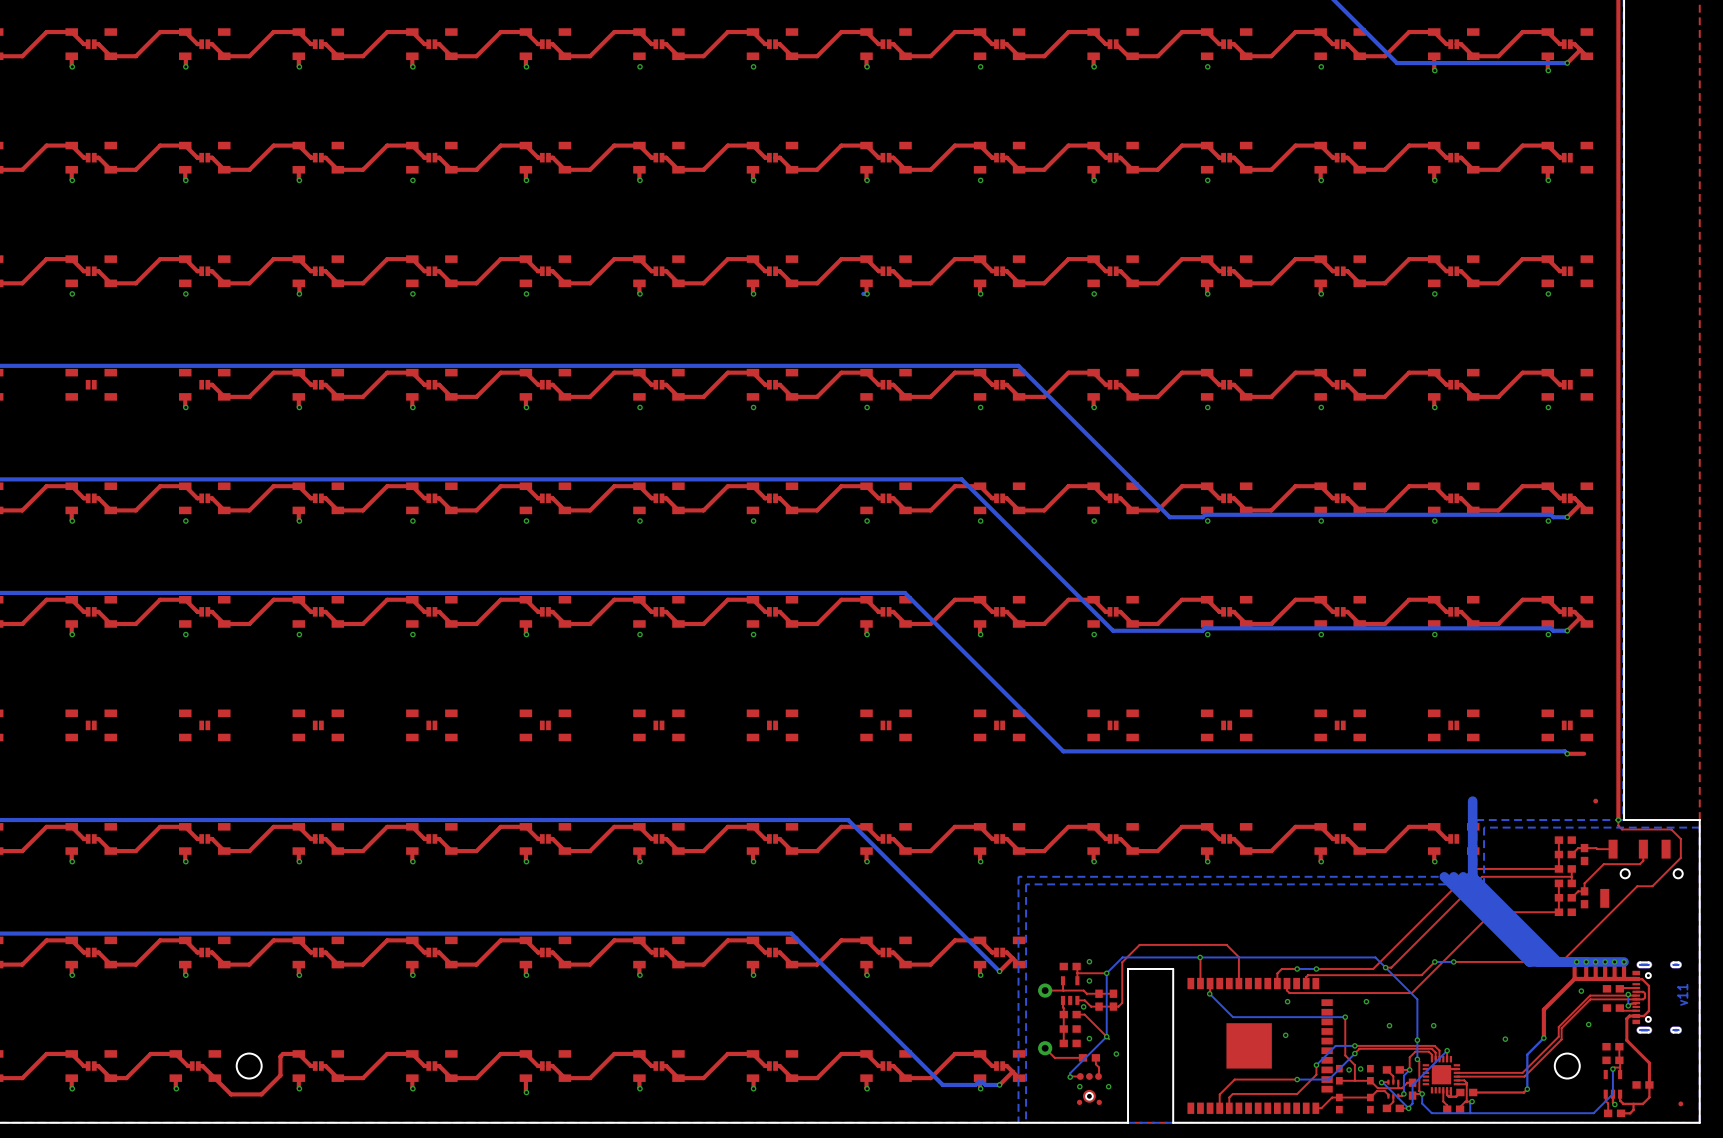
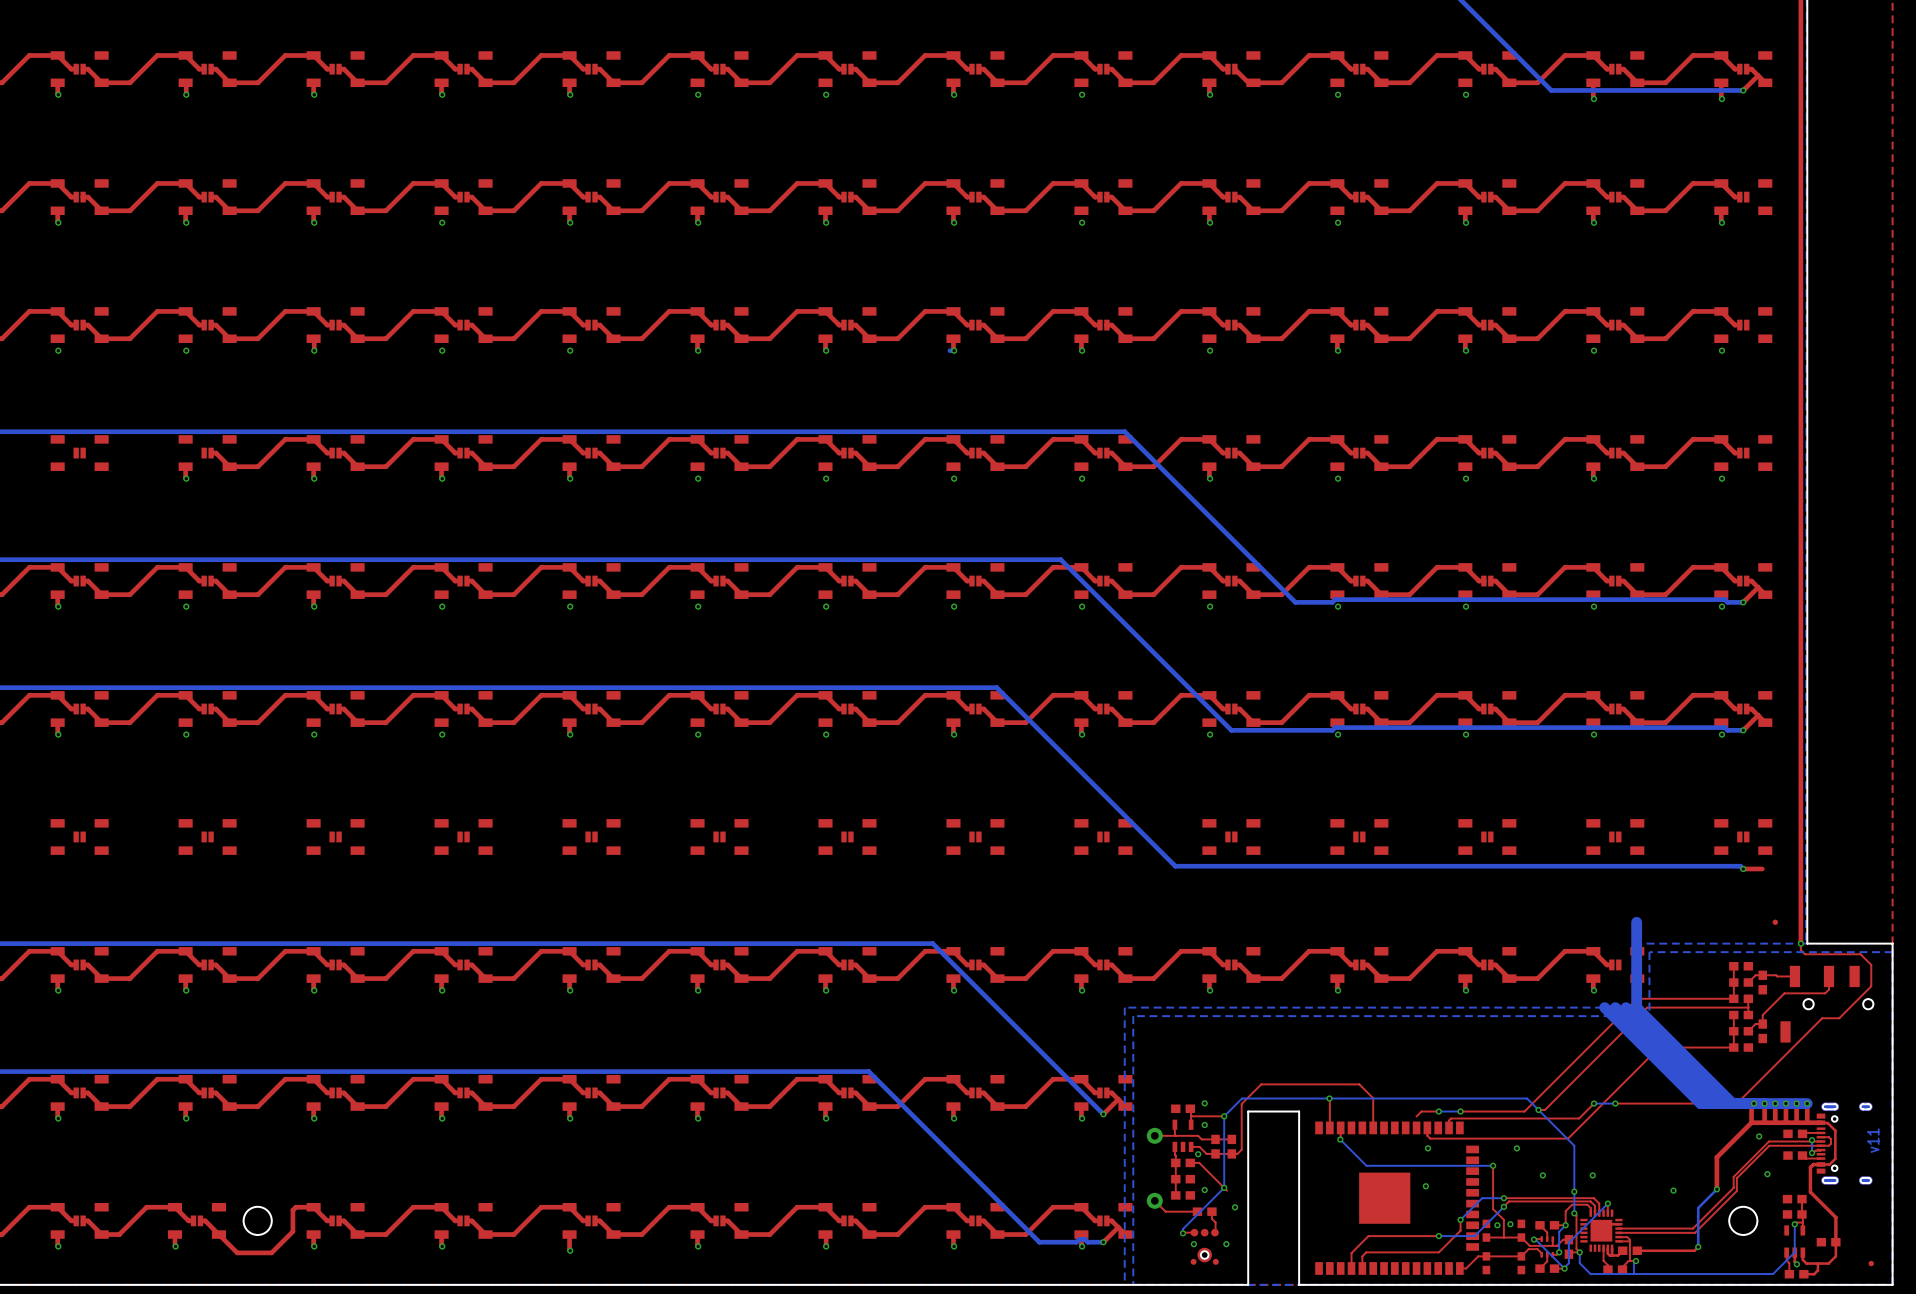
top track: (1277, 973) (1277, 983) -> none

